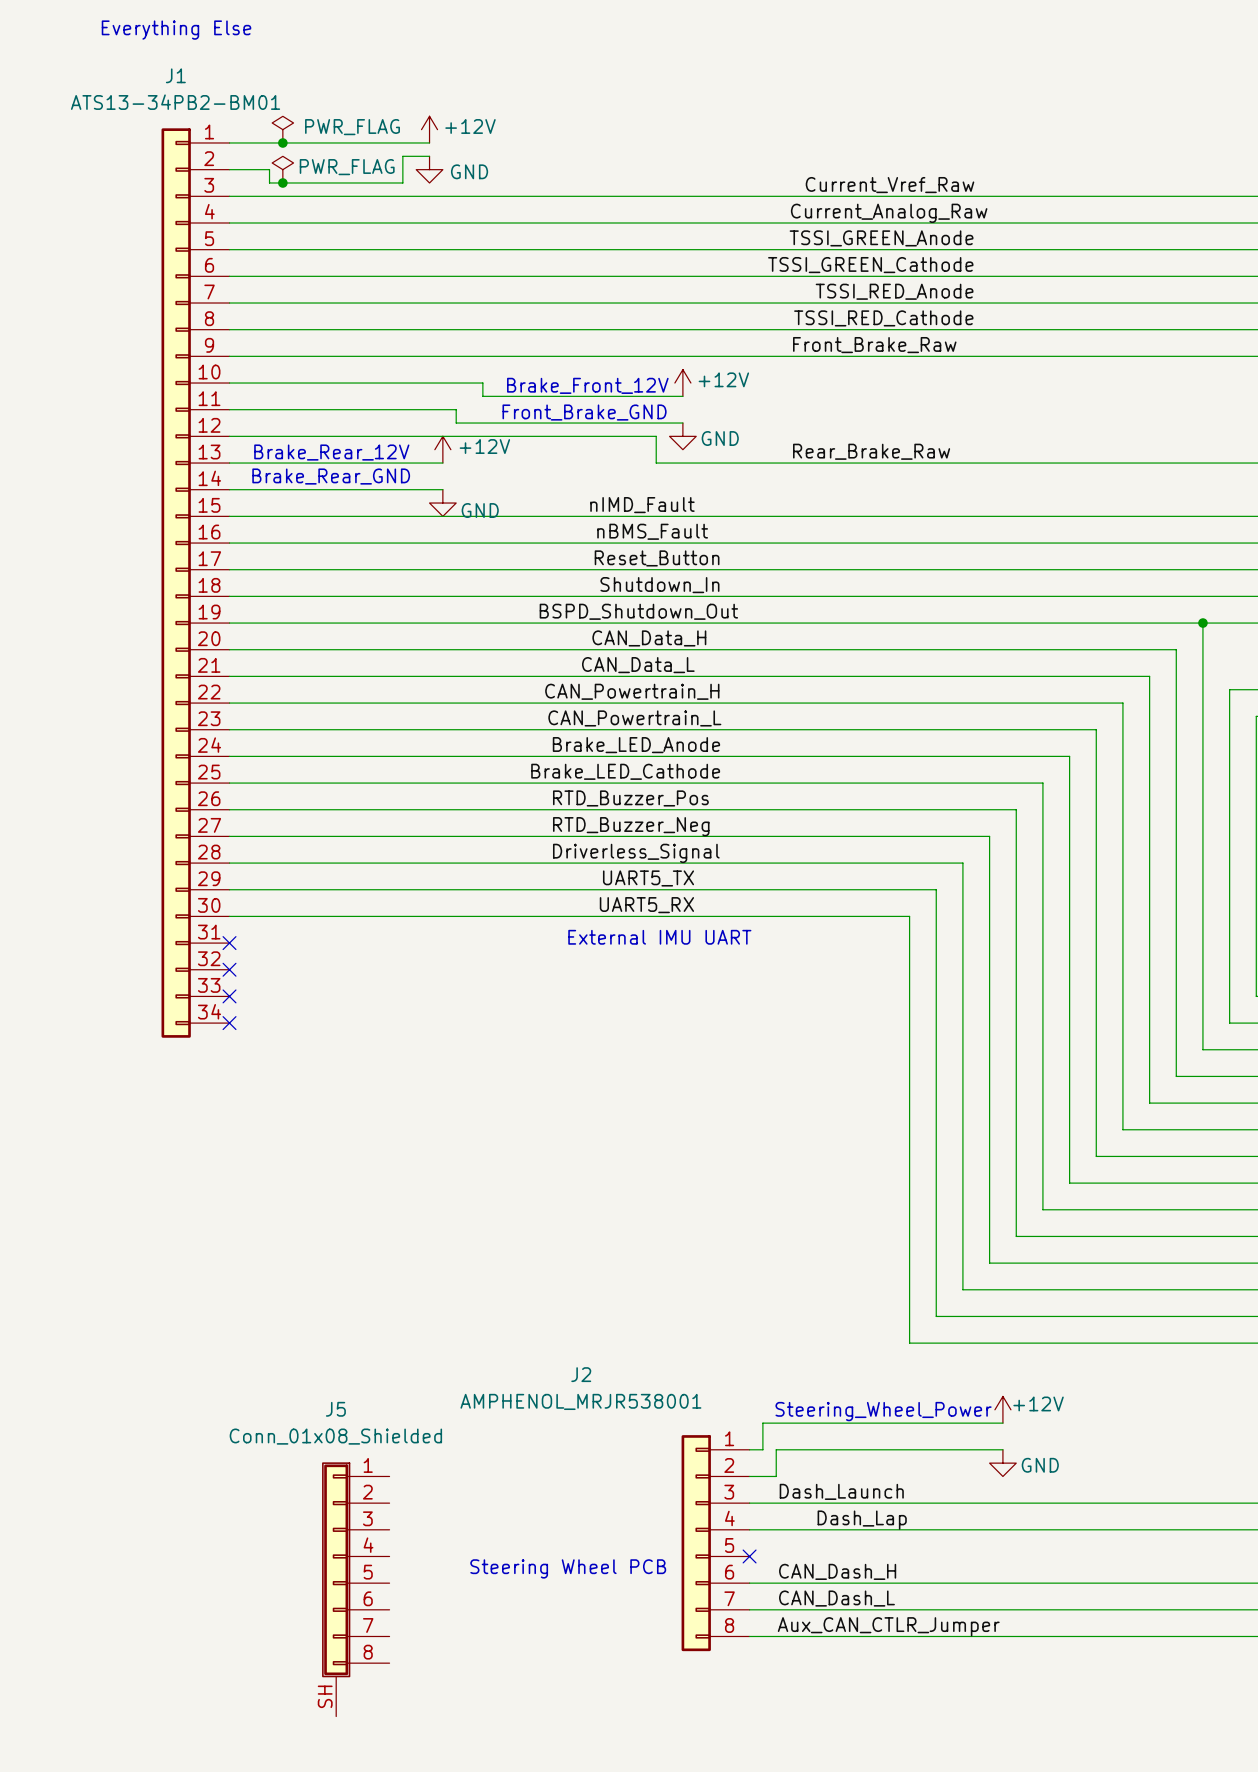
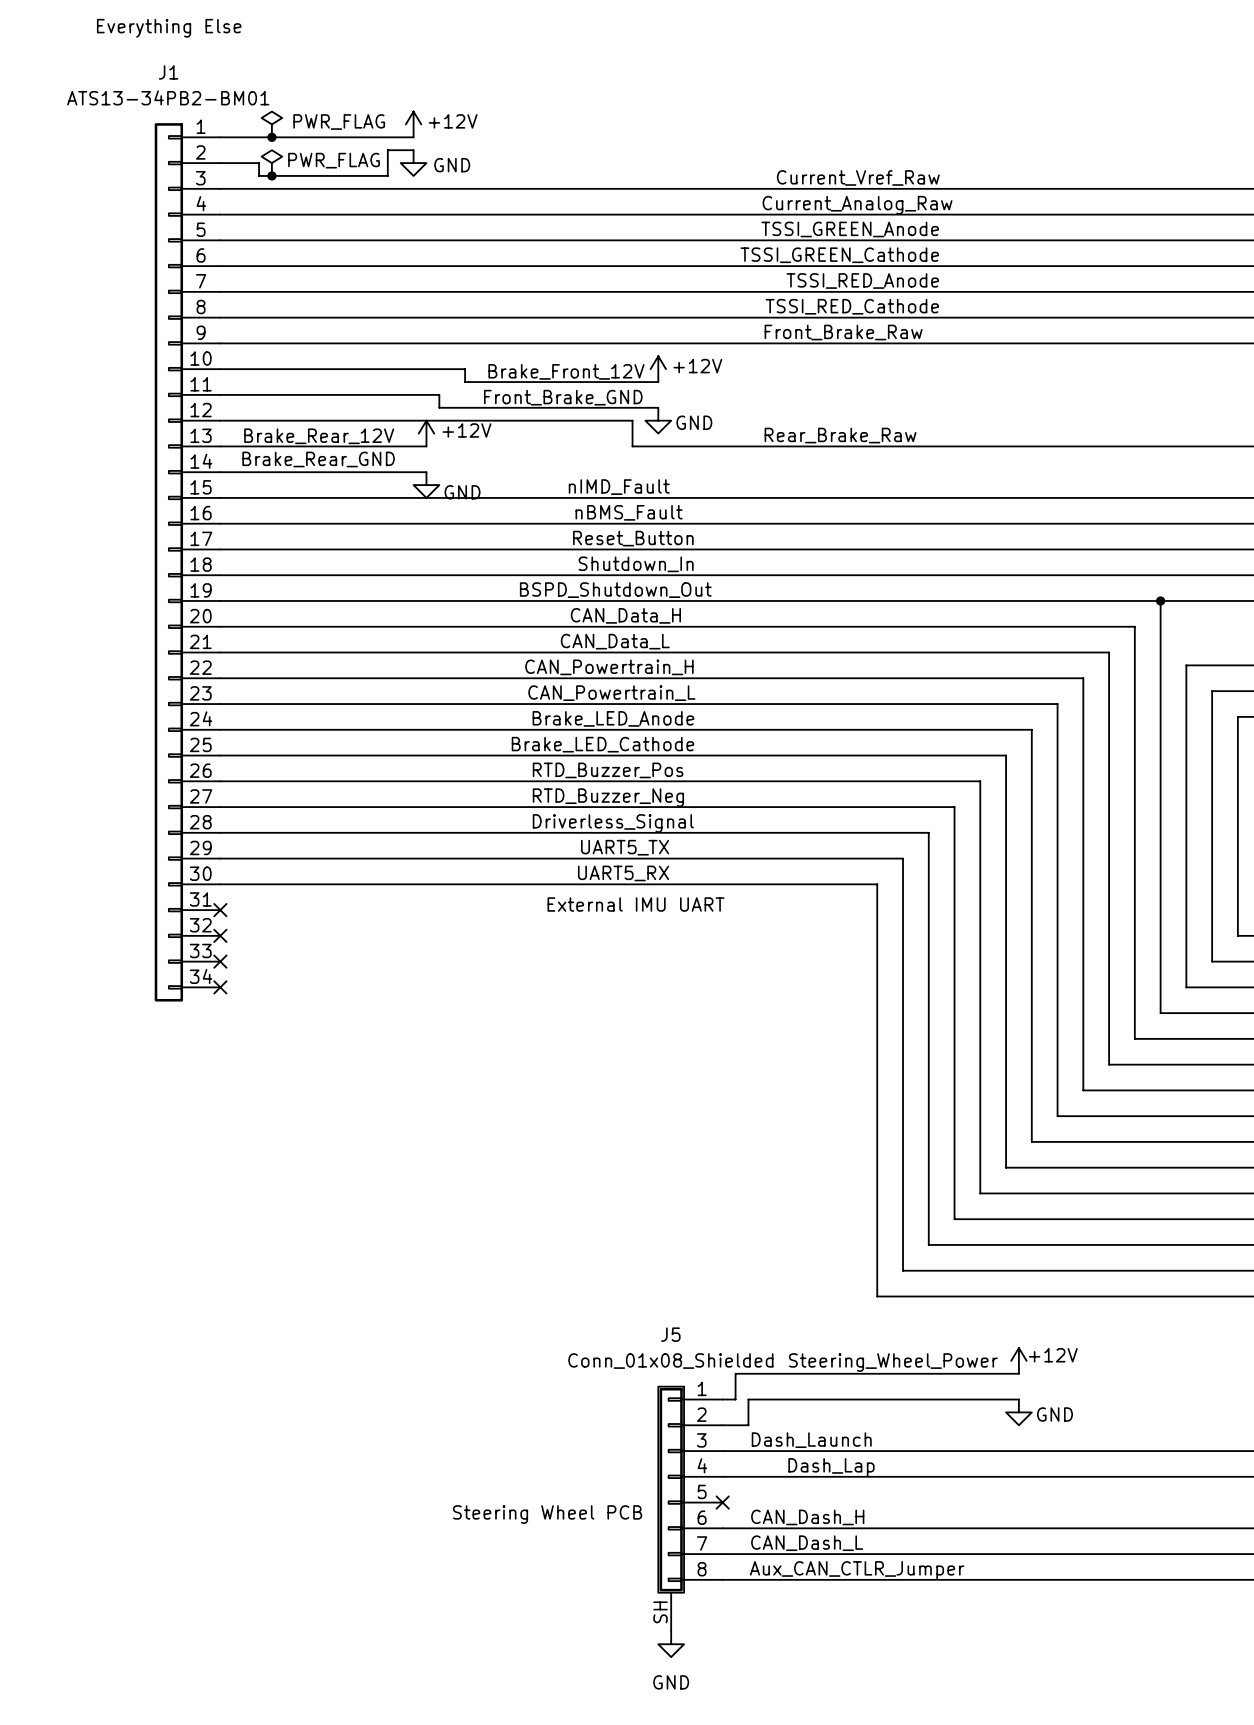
power symbol position: +12V (1002, 1409) -> +12V (1018, 1360)
text position: Steering_Wheel_Power (883, 1411) -> Steering_Wheel_Power (893, 1362)
wire: none -> (967, 1373) (1018, 1373)
wire: none -> (967, 1399) (1018, 1399)
power symbol position: GND (1002, 1463) -> GND (1018, 1412)
J2: AMPHENOL_MRJR538001 (715, 1543) -> none
J5 position: (355, 1589) -> (690, 1508)
power symbol: none -> GND (671, 1644)

